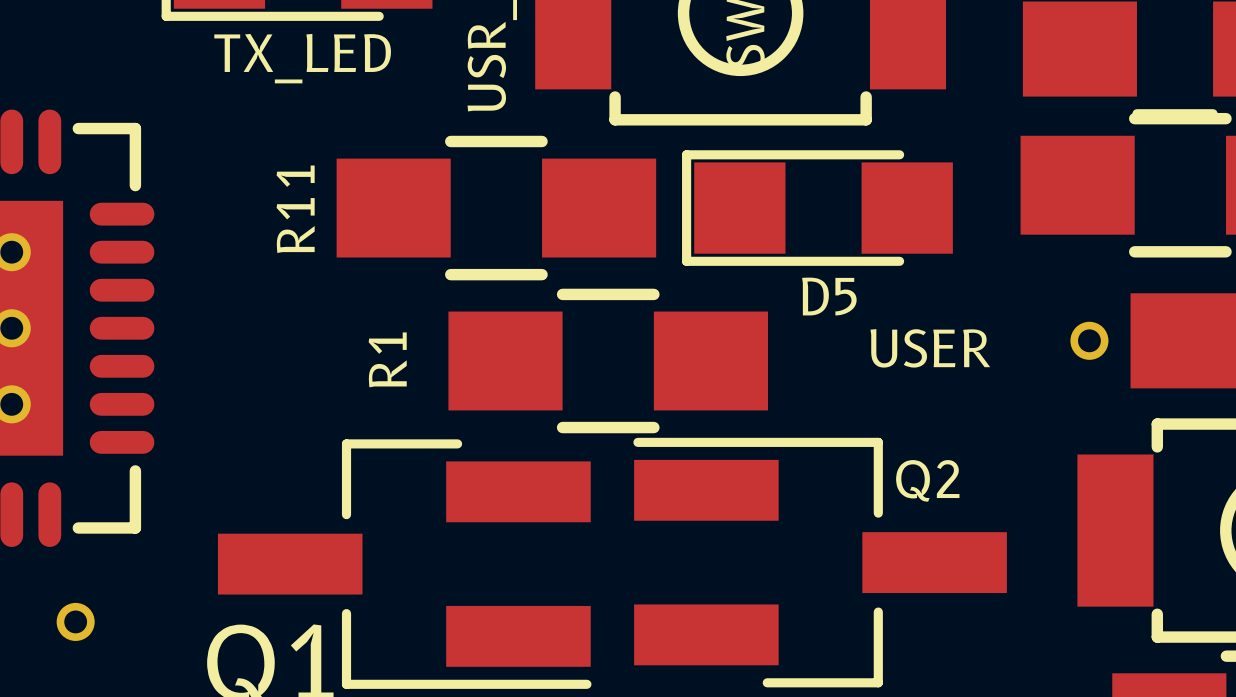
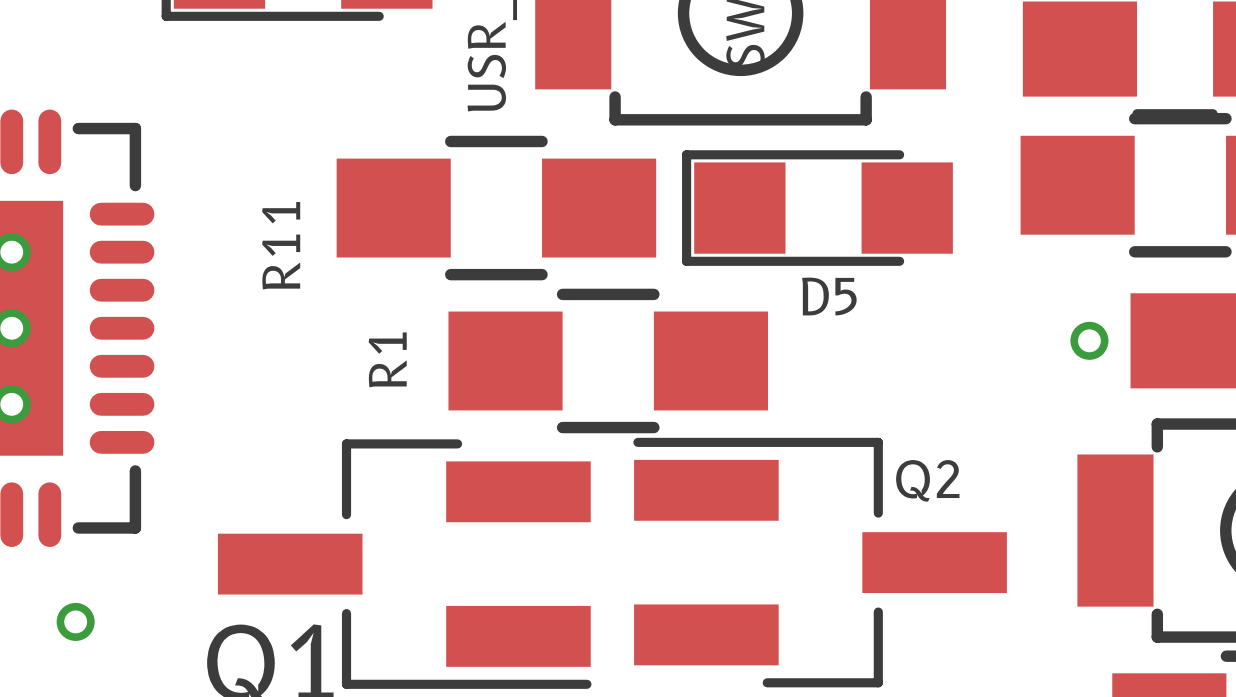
part value: TX_LED (302, 58) -> none
R11 name position: R11 (295, 209) -> R11 (281, 245)
D5 value: USER (930, 348) -> none

